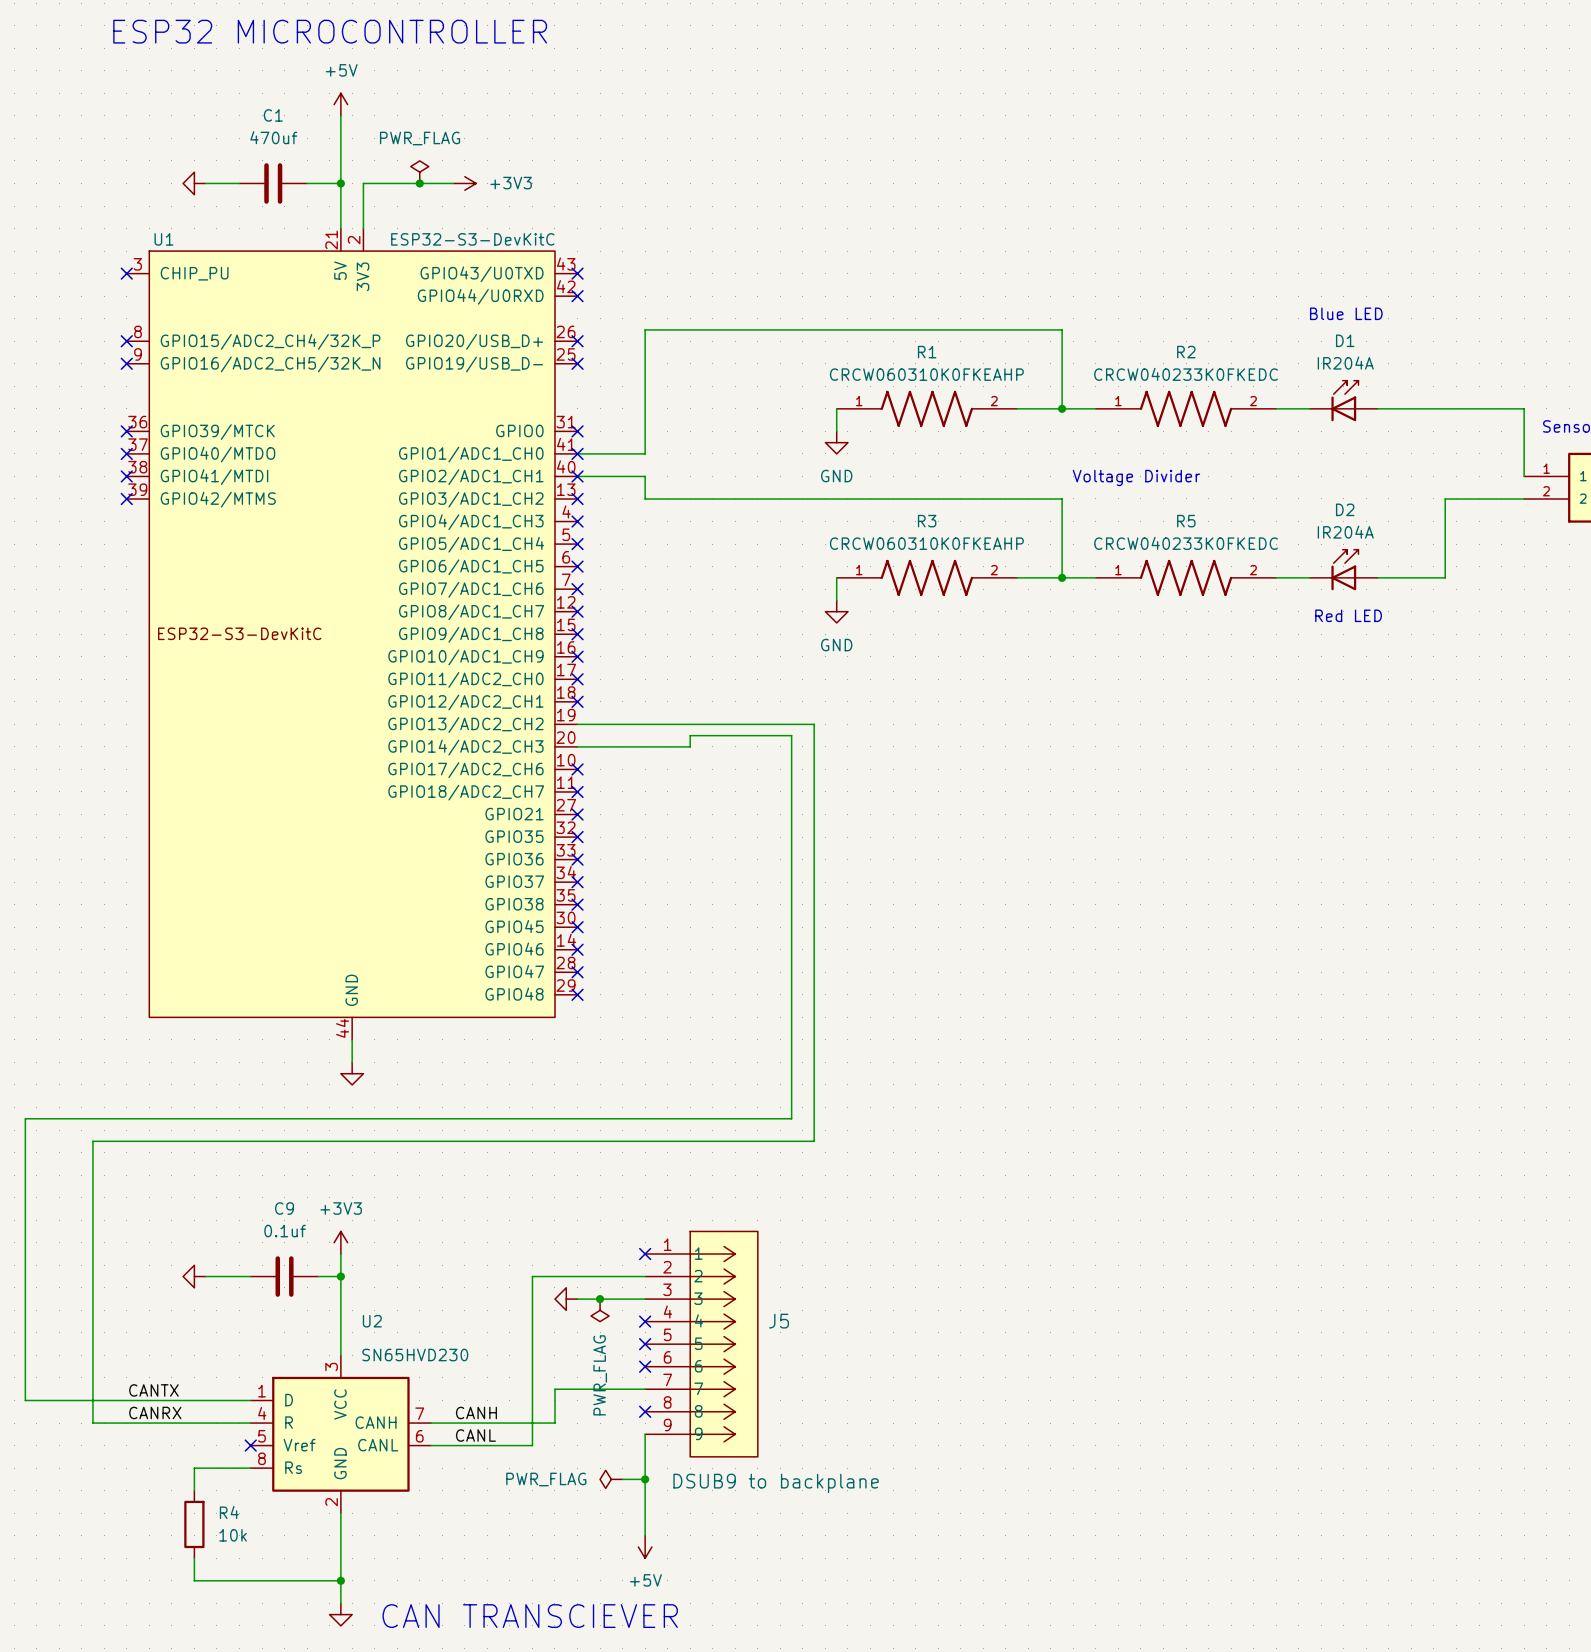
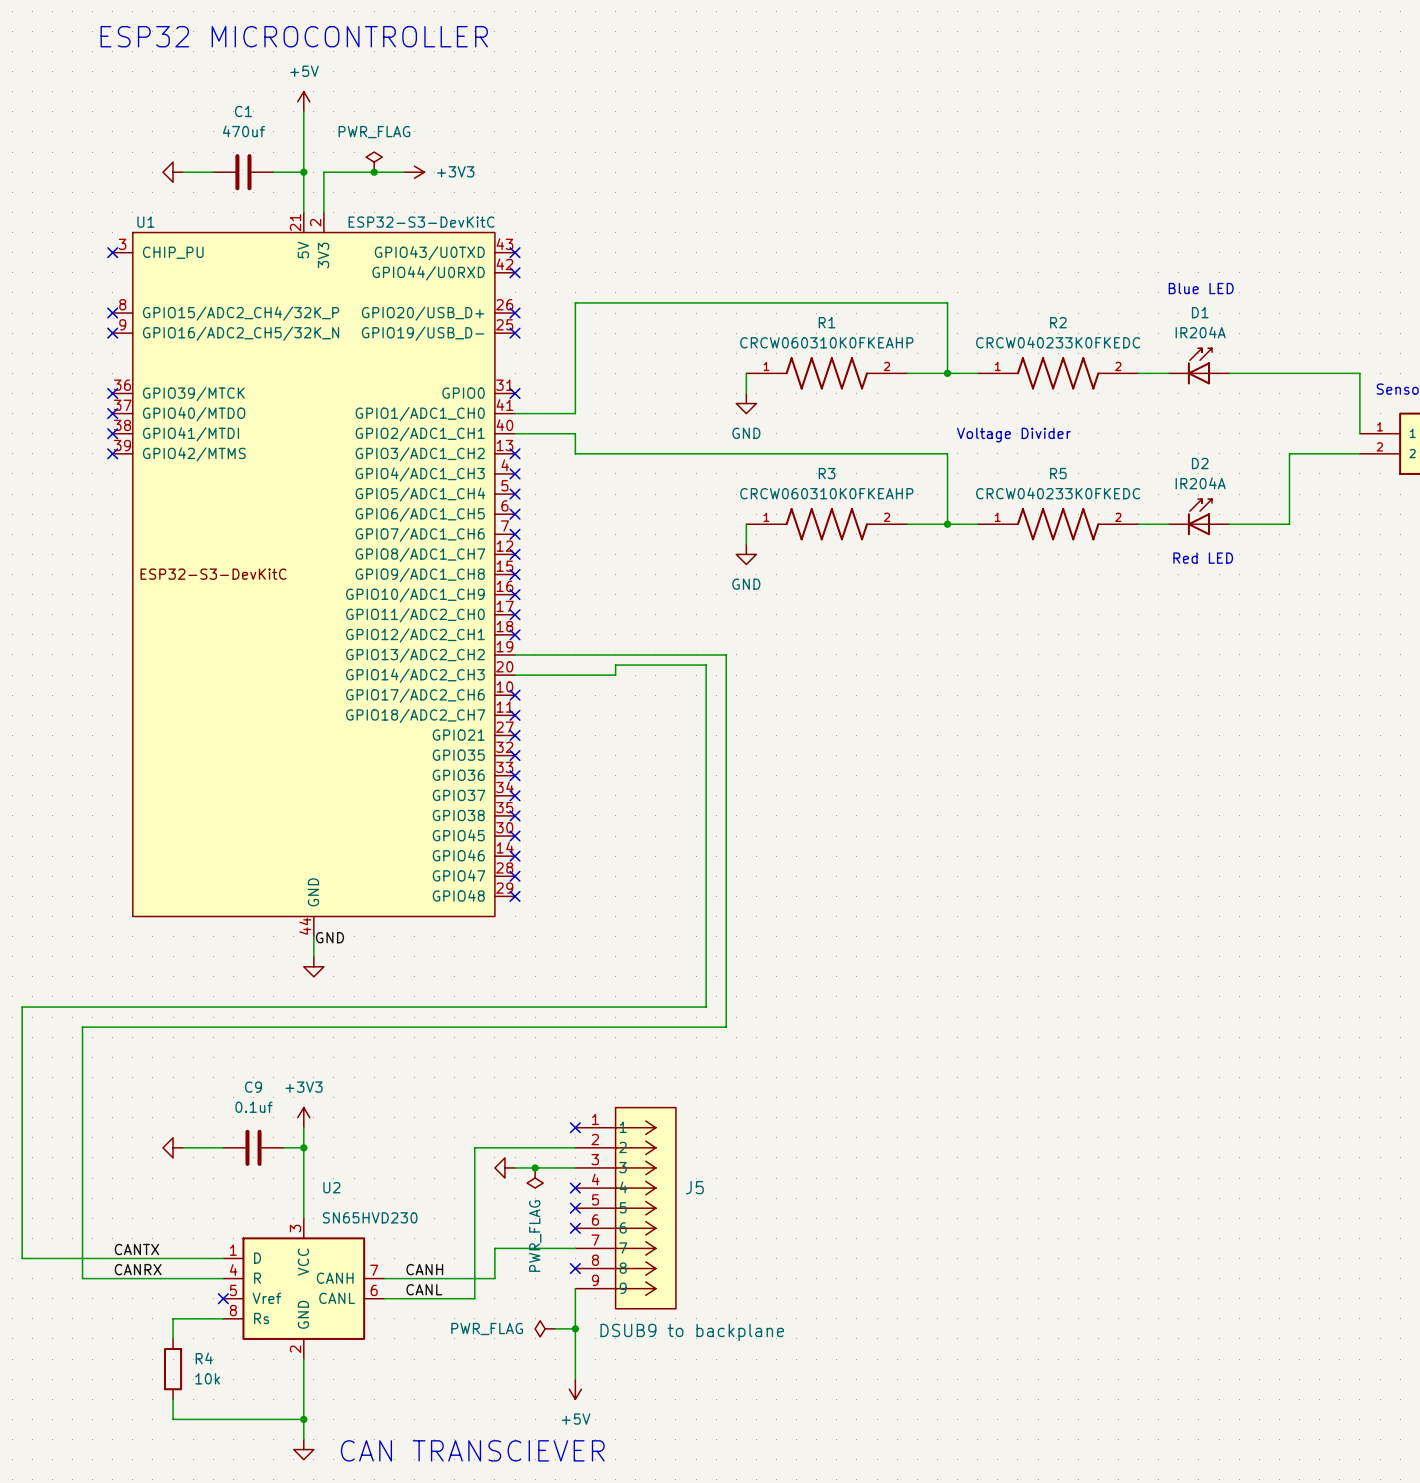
no-connect mark: (577, 453) -> none
no-connect mark: (577, 476) -> none
label: none -> GND (329, 937)

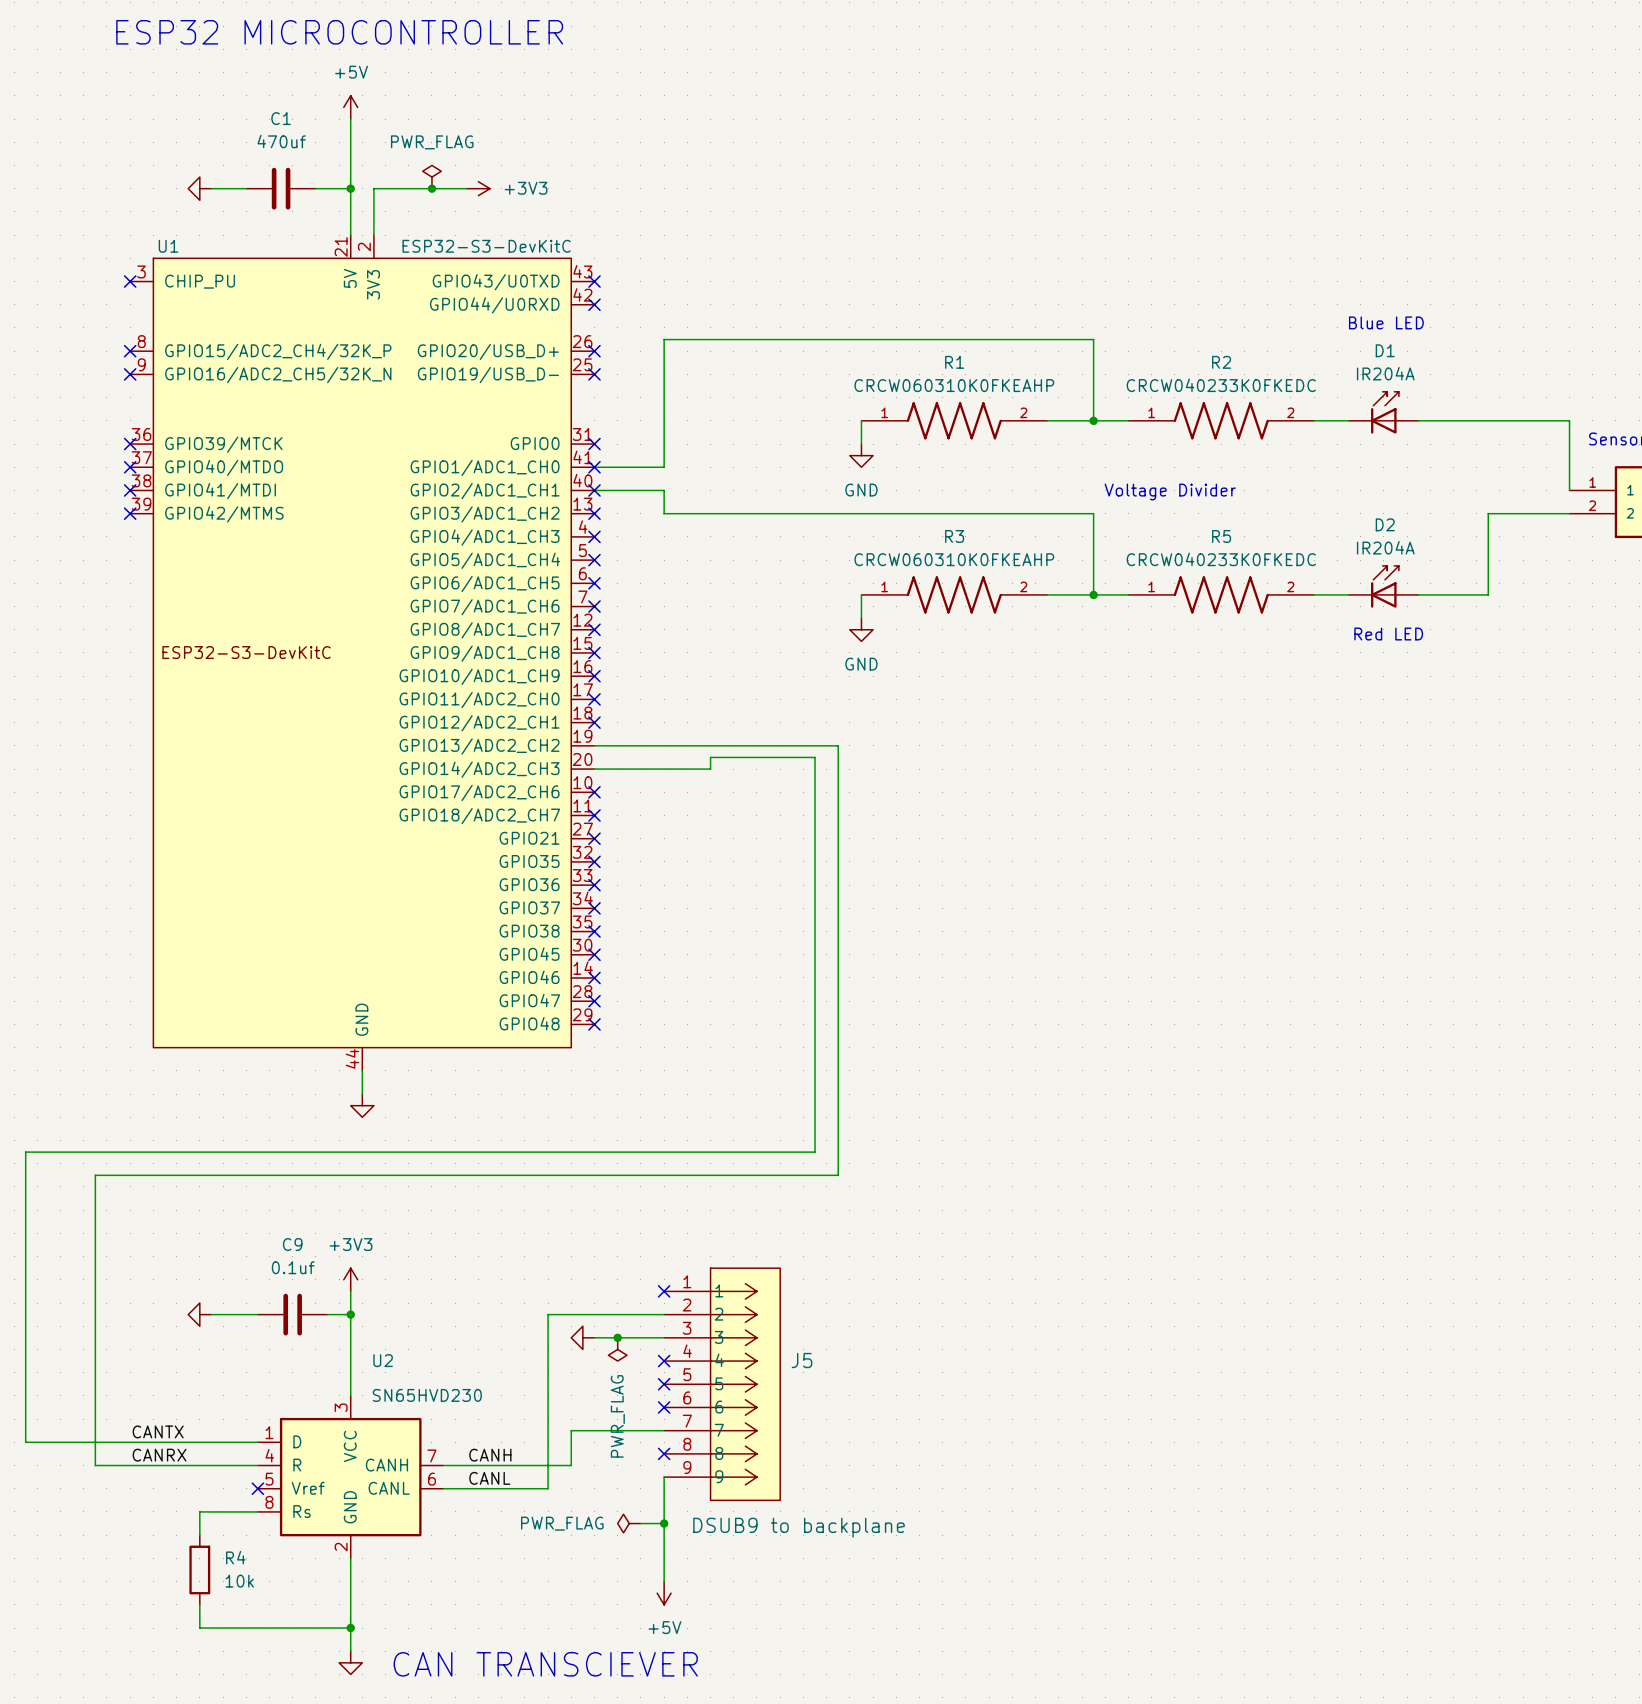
no-connect mark: none -> (594, 467)
no-connect mark: none -> (594, 490)
label: GND (329, 937) -> none

